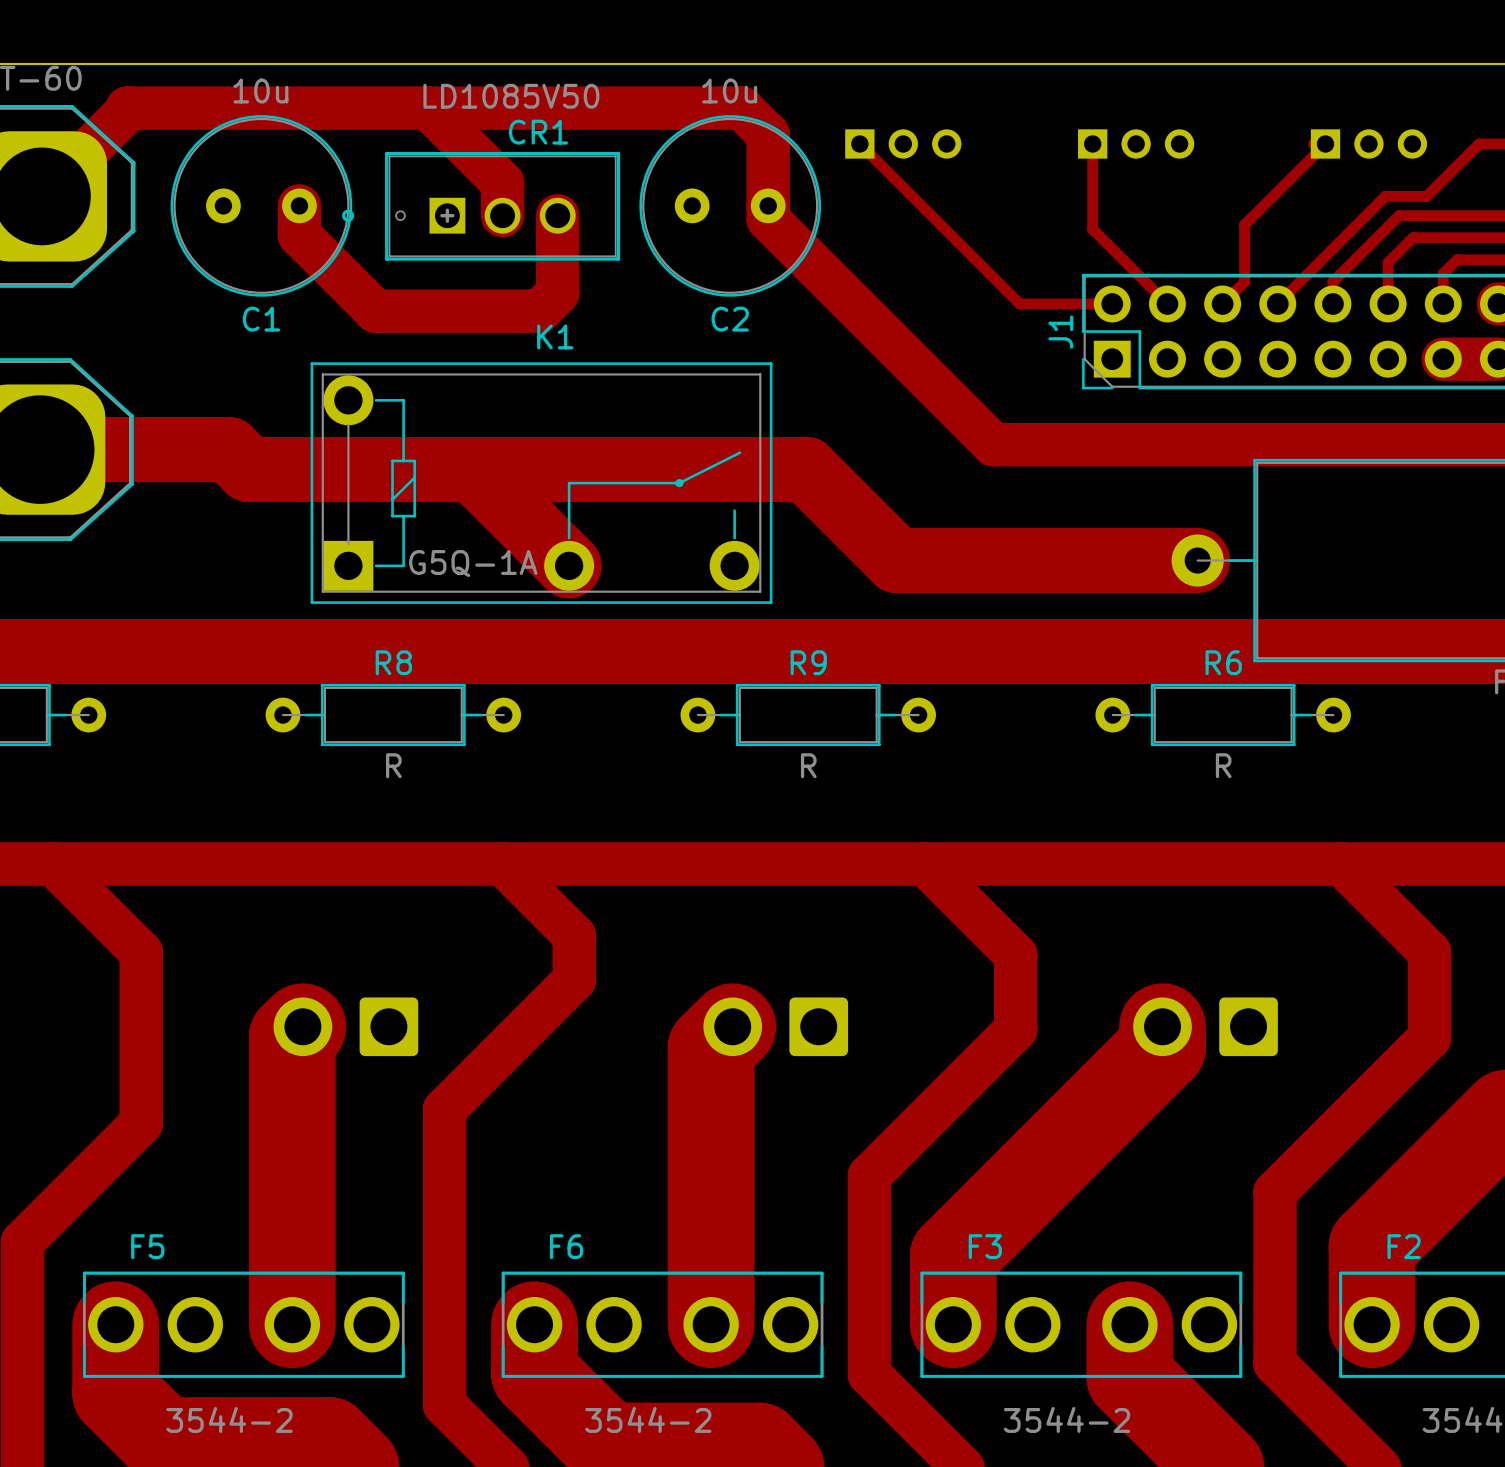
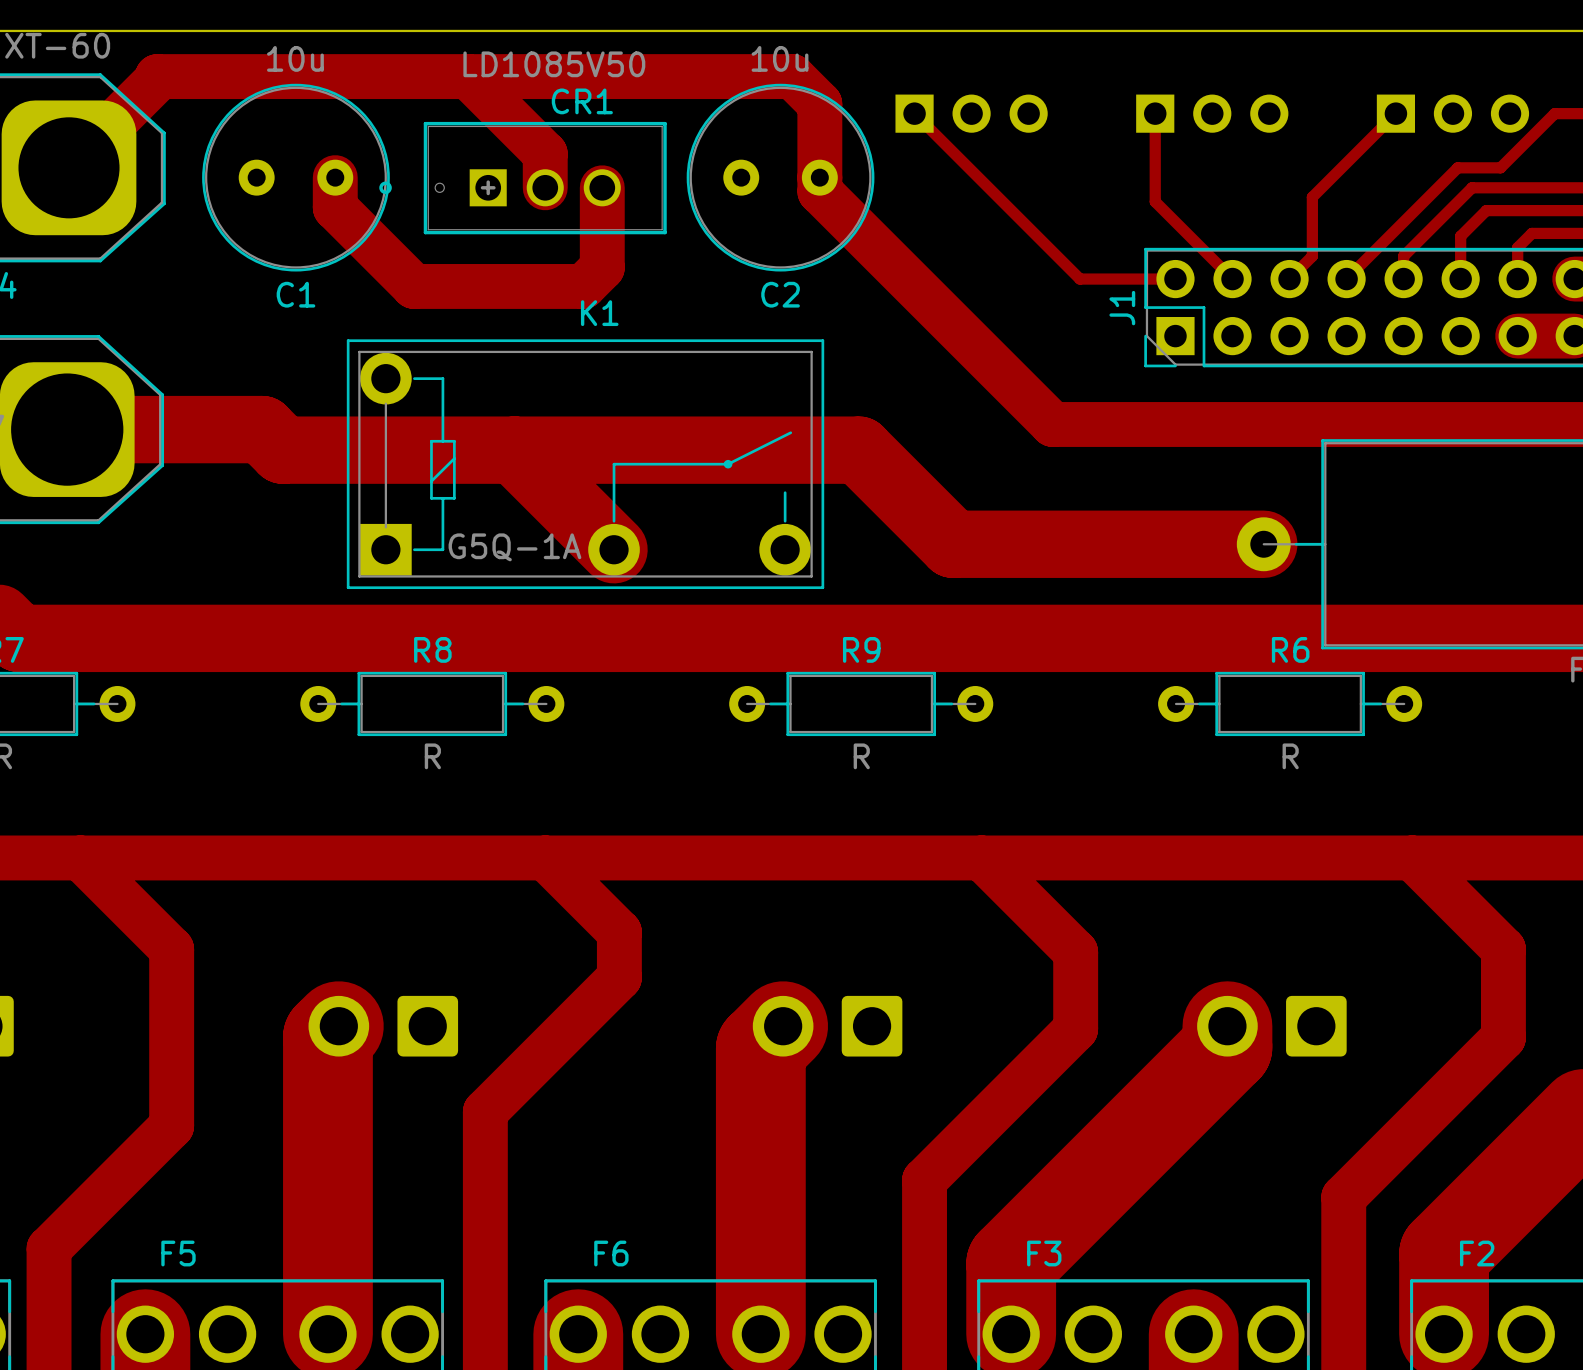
part footprint: [845, 129, 962, 159] -> [895, 94, 1048, 133]
part footprint: [1078, 129, 1195, 159] -> [1136, 94, 1289, 133]
part footprint: [1310, 129, 1428, 159] -> [1376, 94, 1530, 133]

